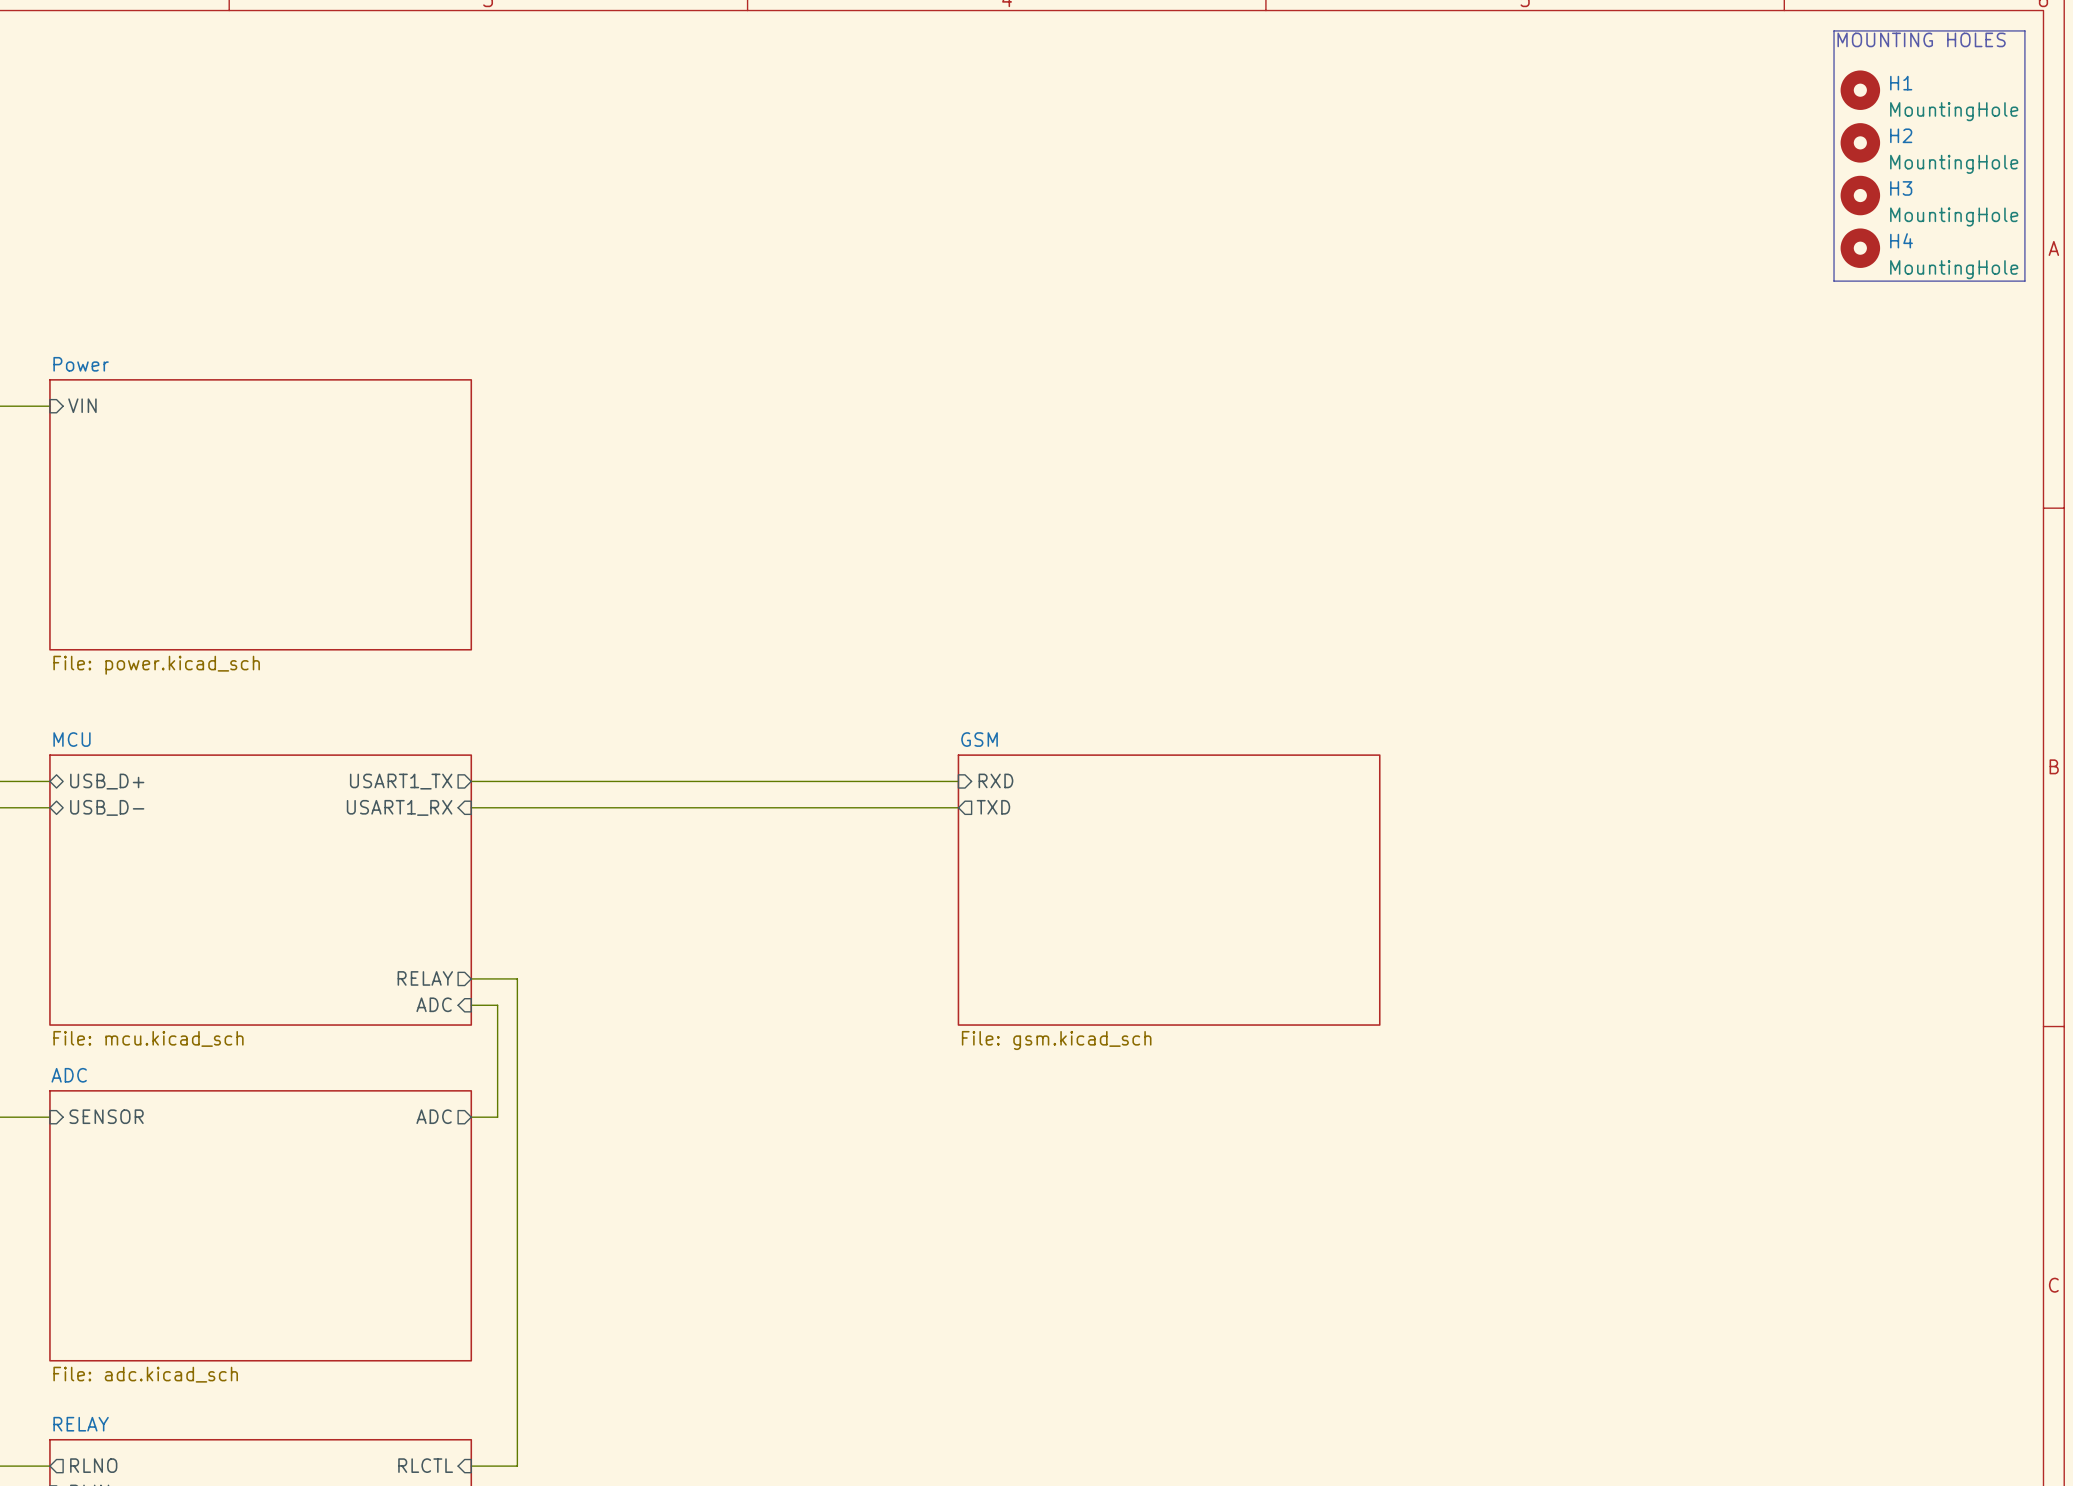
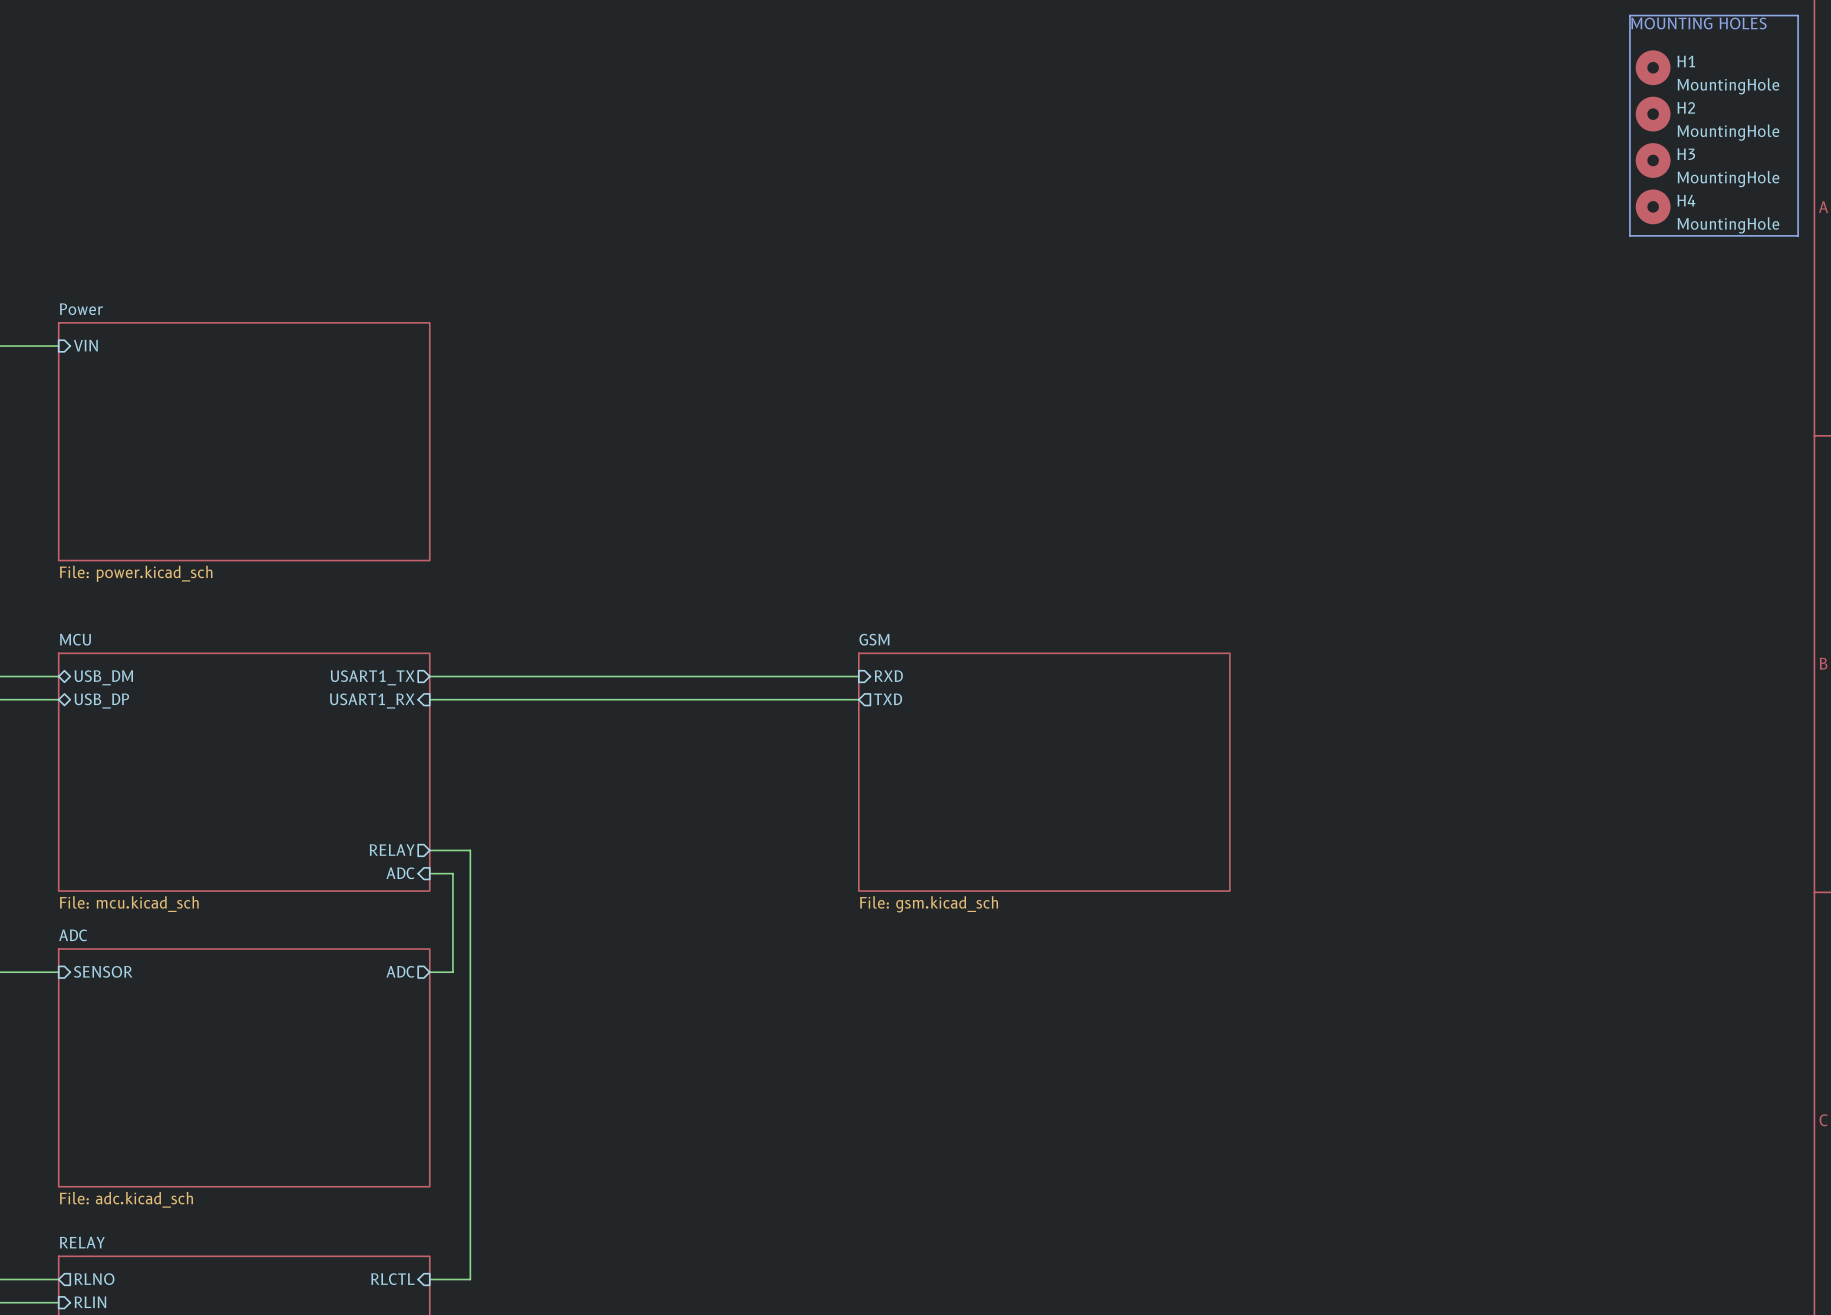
sheet pin: USB_D+ (107, 781) -> USB_DM (103, 677)
sheet pin: USB_D- (107, 807) -> USB_DP (101, 701)

